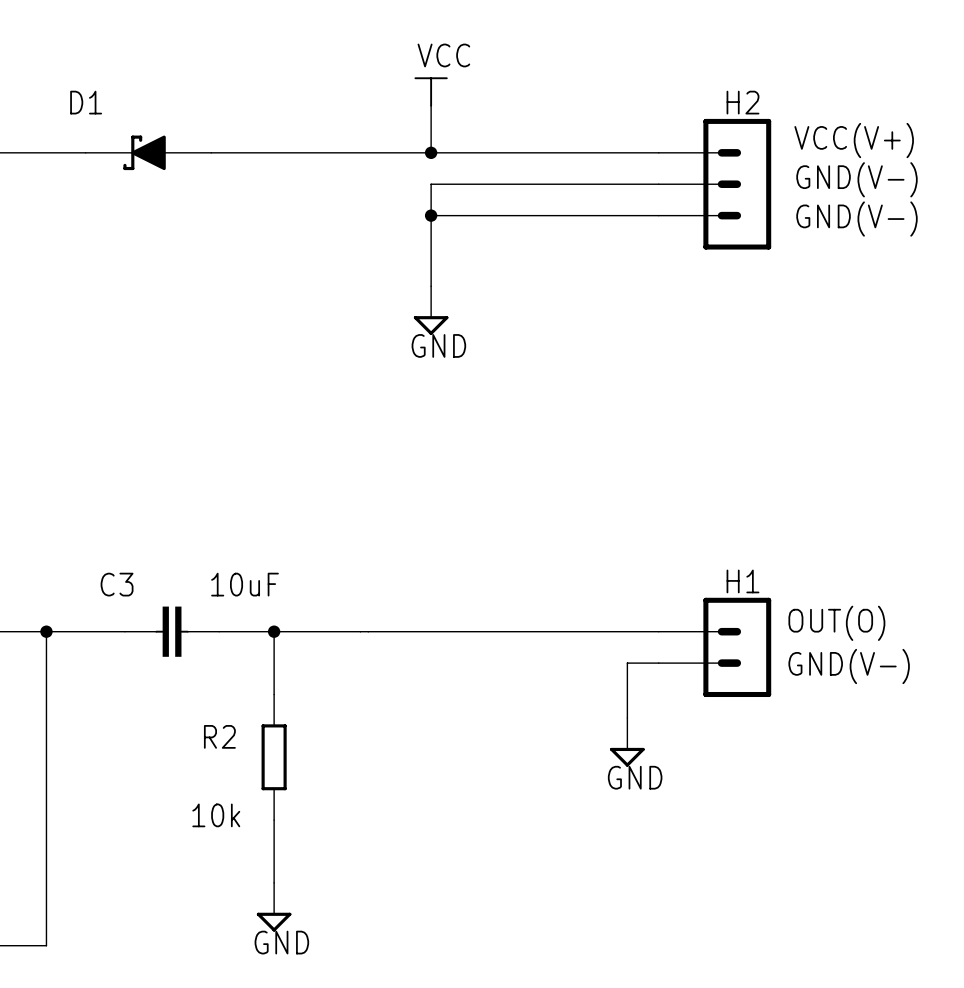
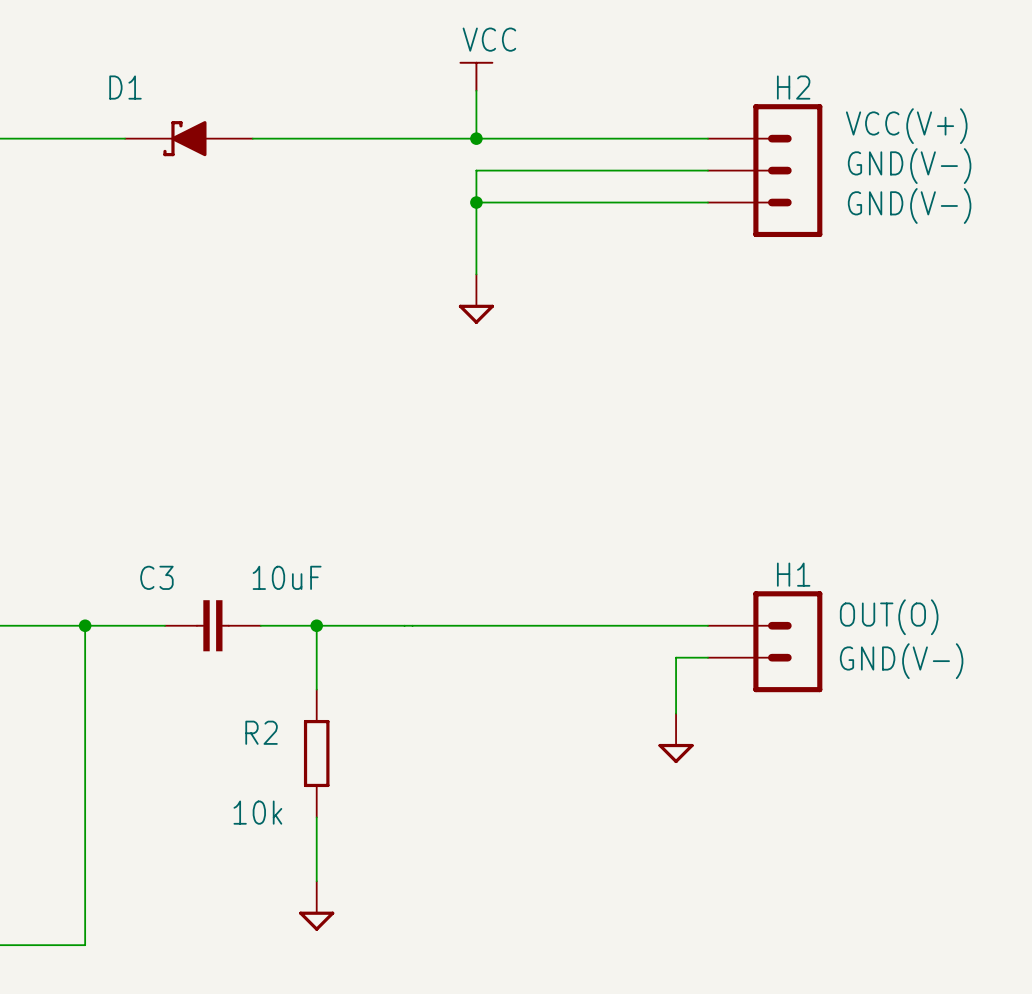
power symbol text: GND (438, 345) -> none
power symbol text: GND (635, 777) -> none
power symbol text: GND (281, 942) -> none

